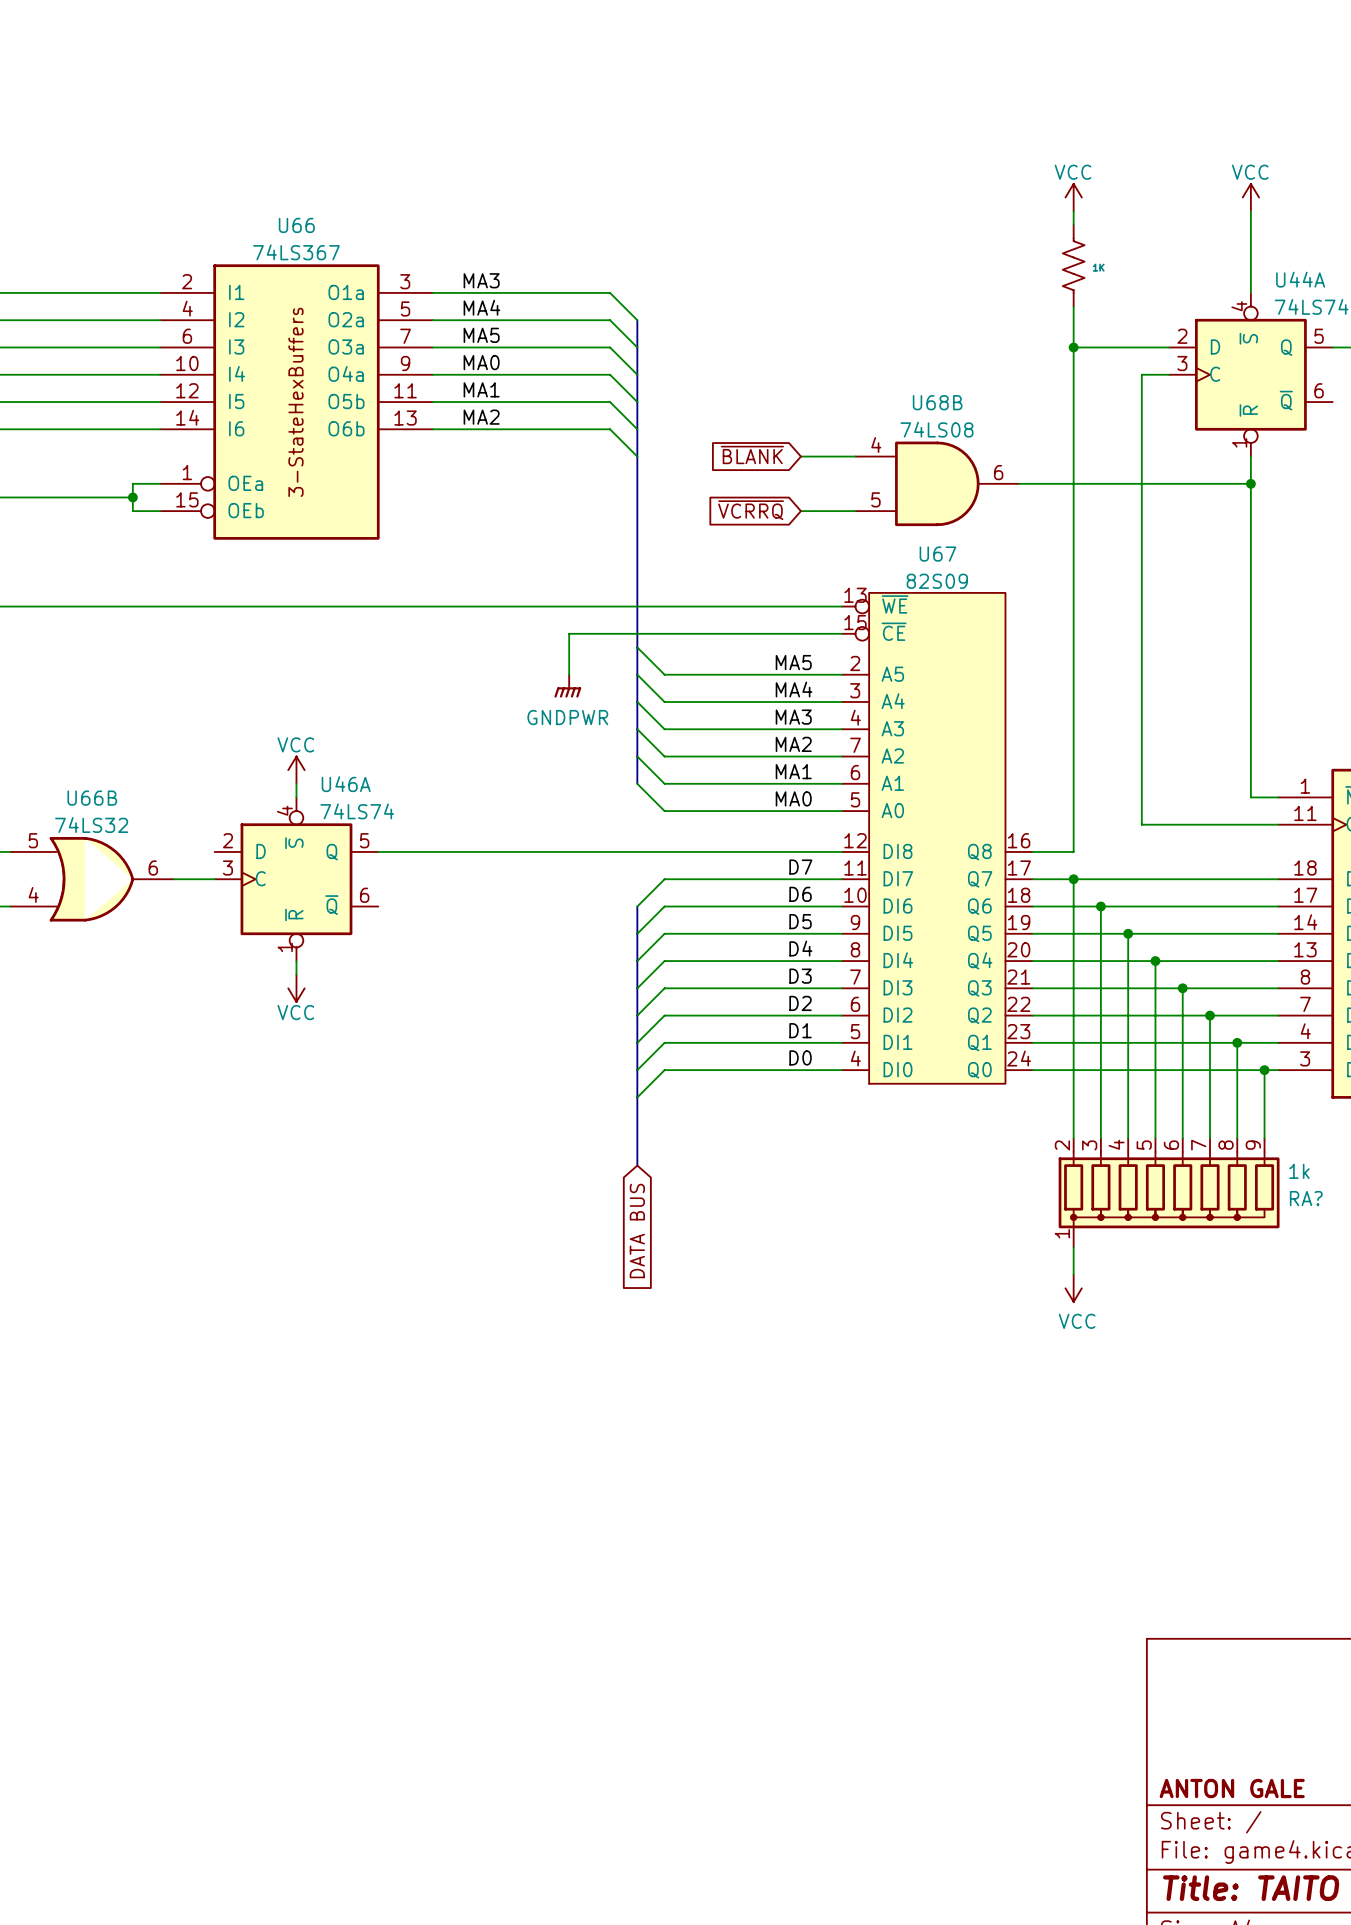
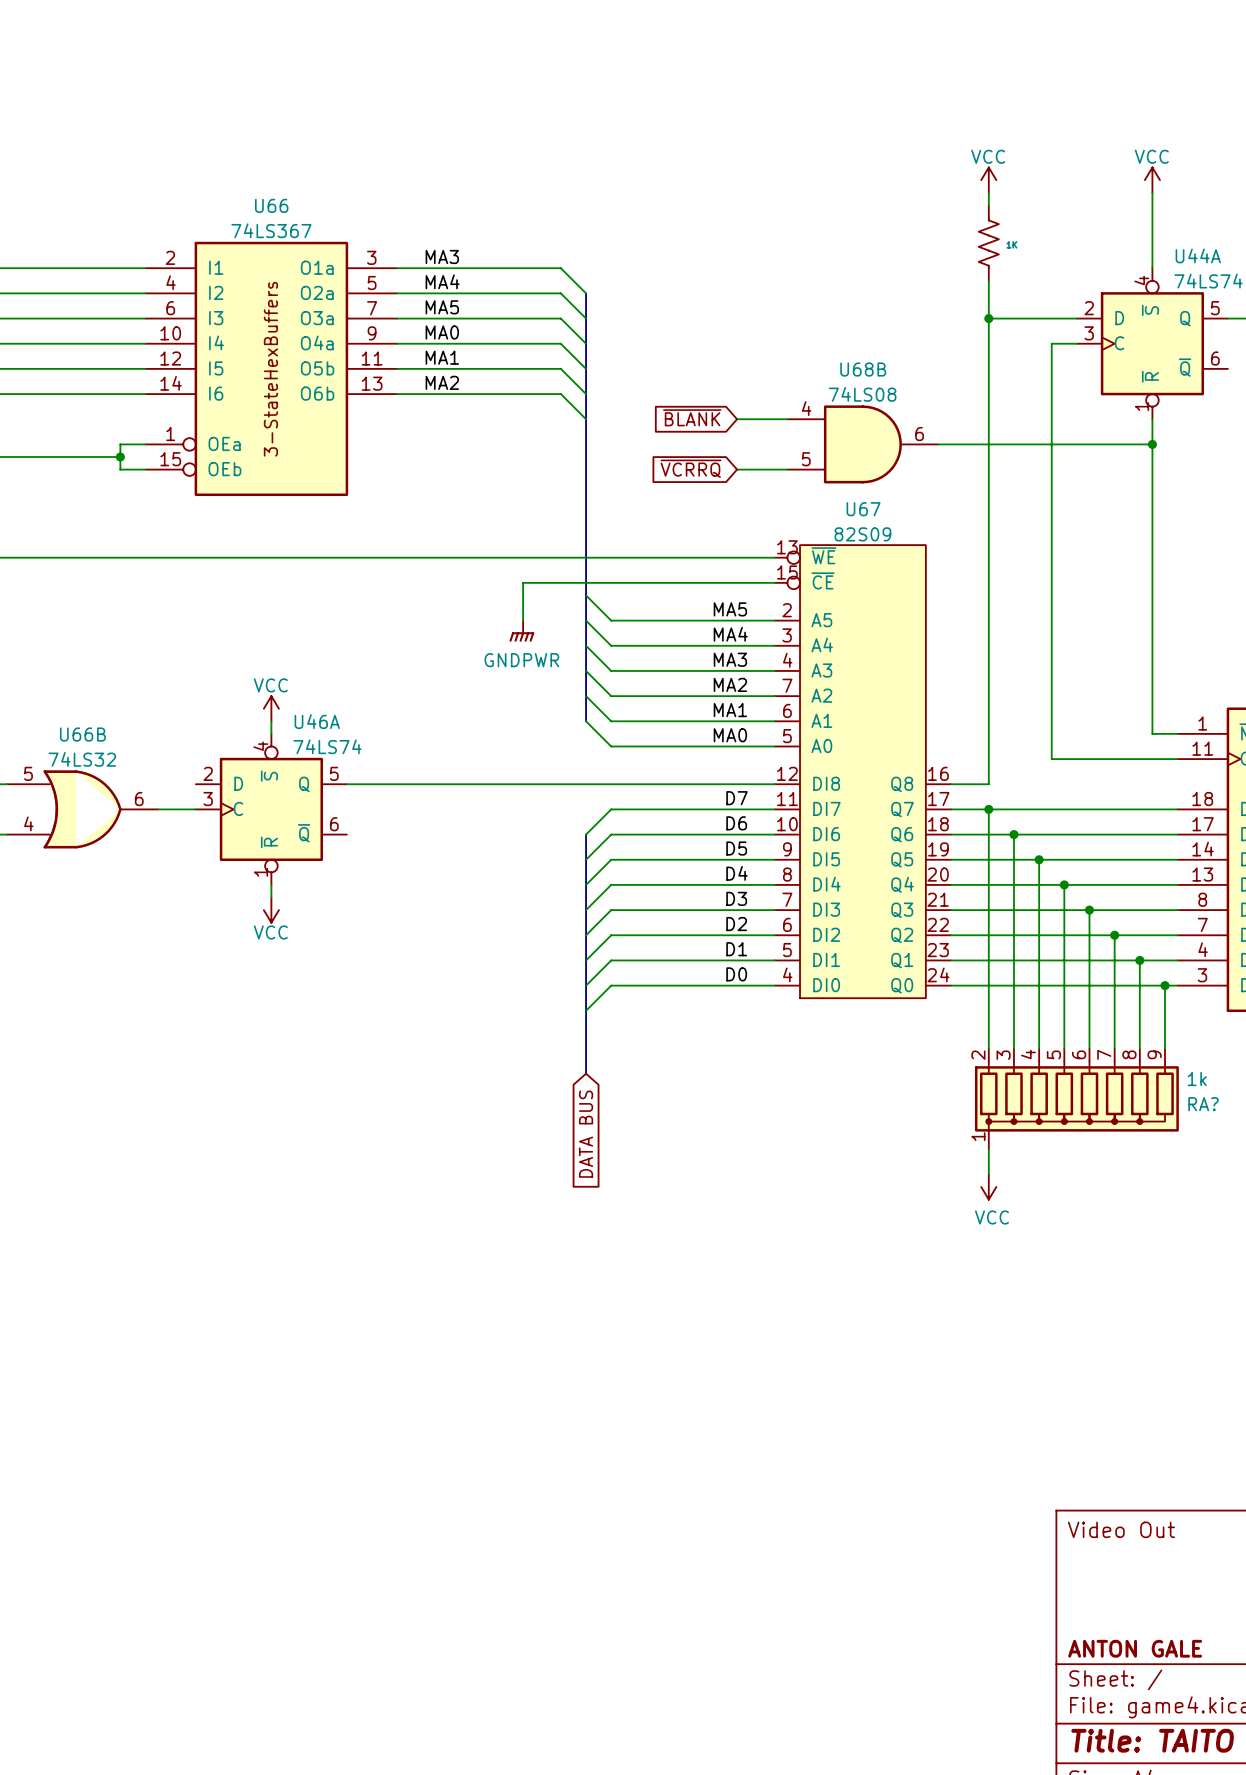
title block: none -> Video Out (1121, 1529)

